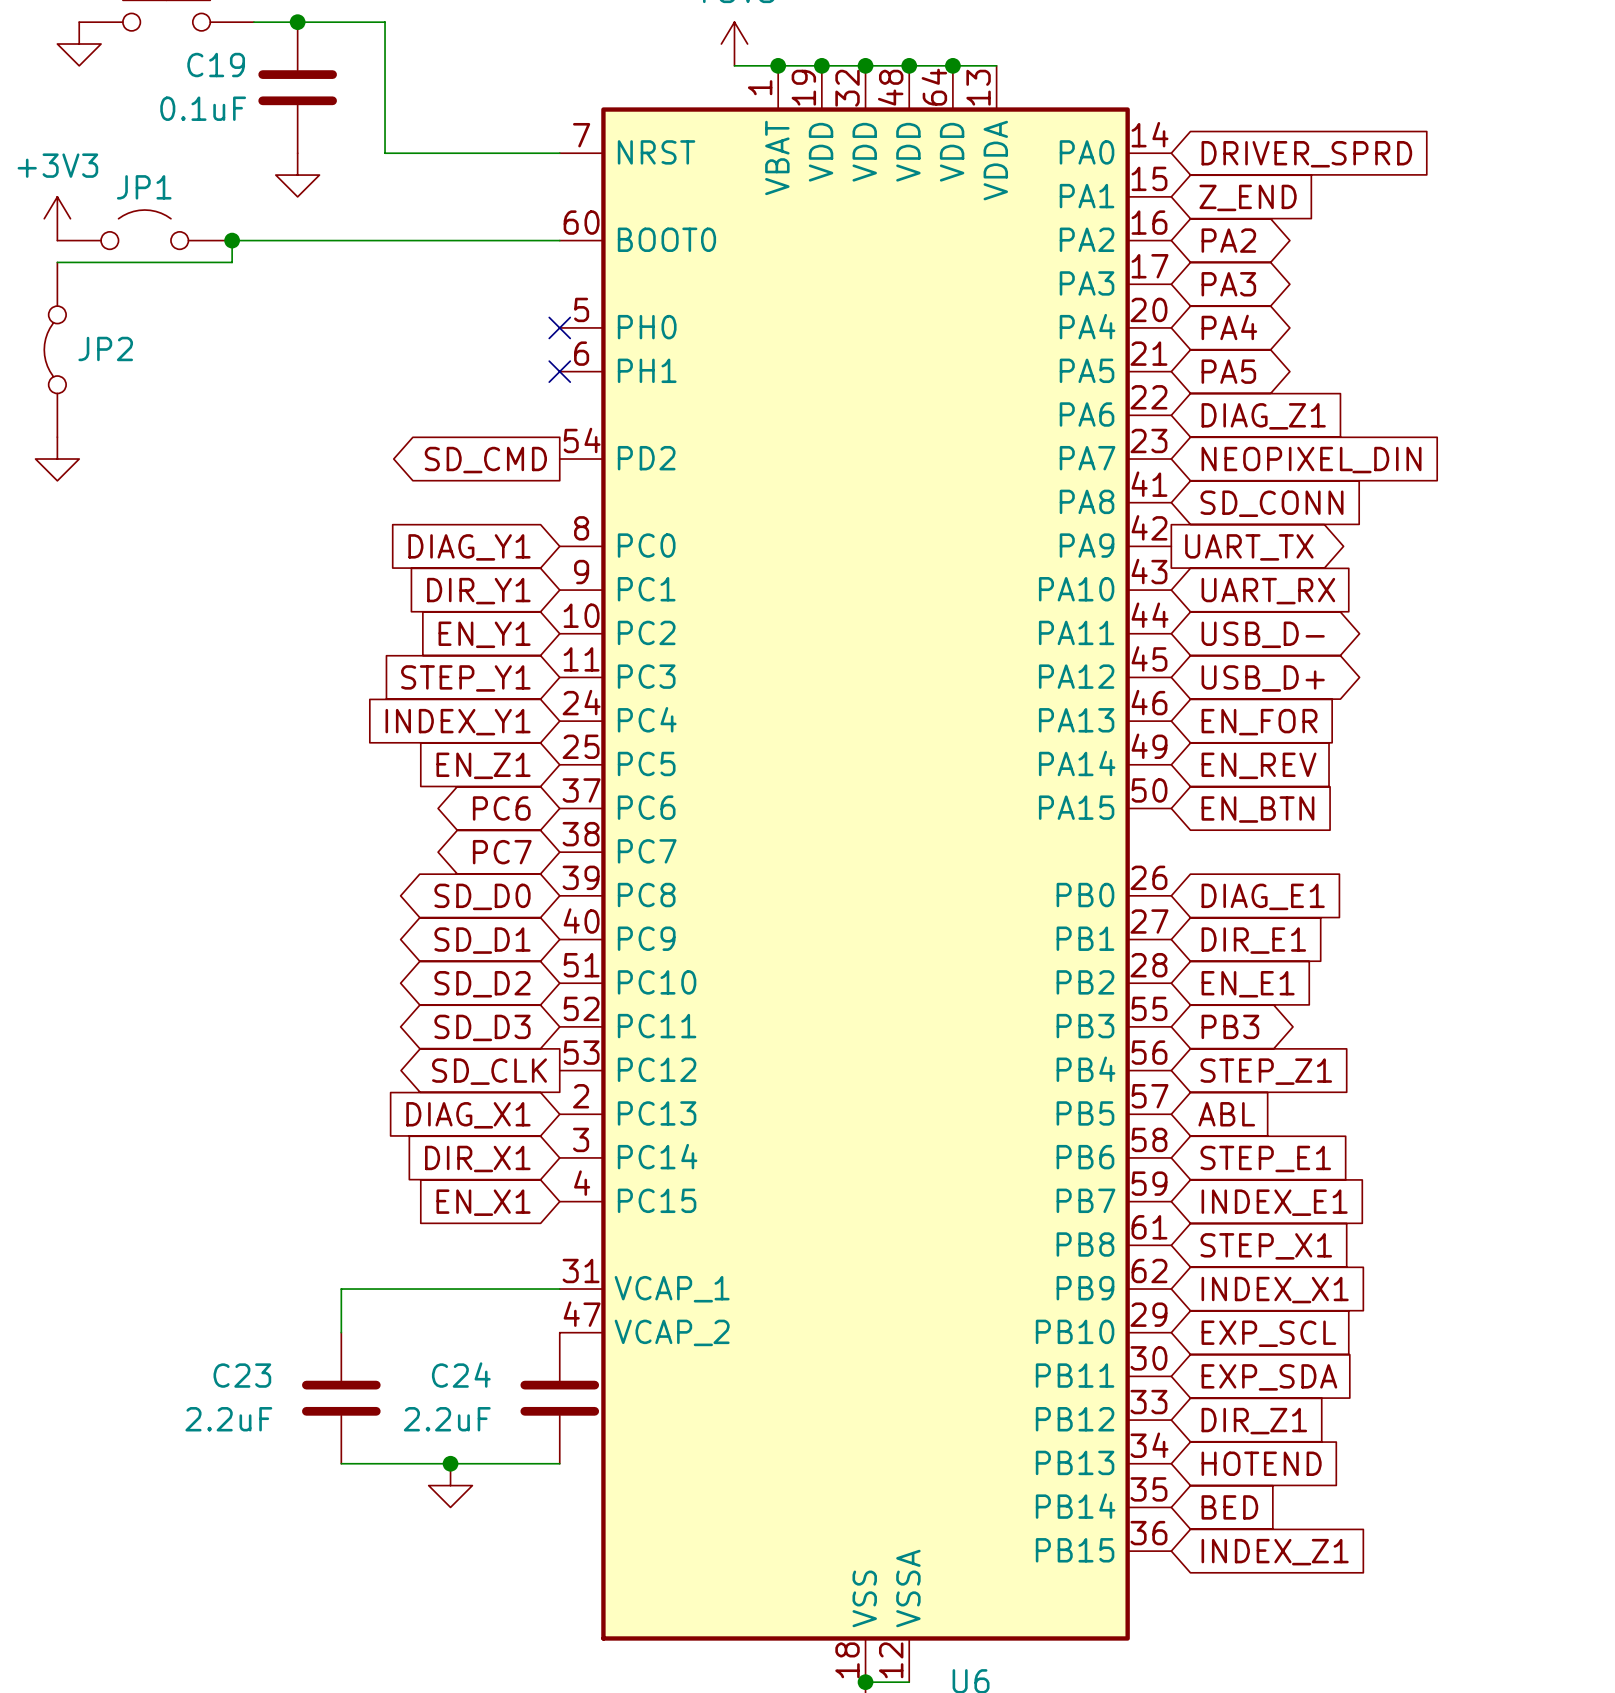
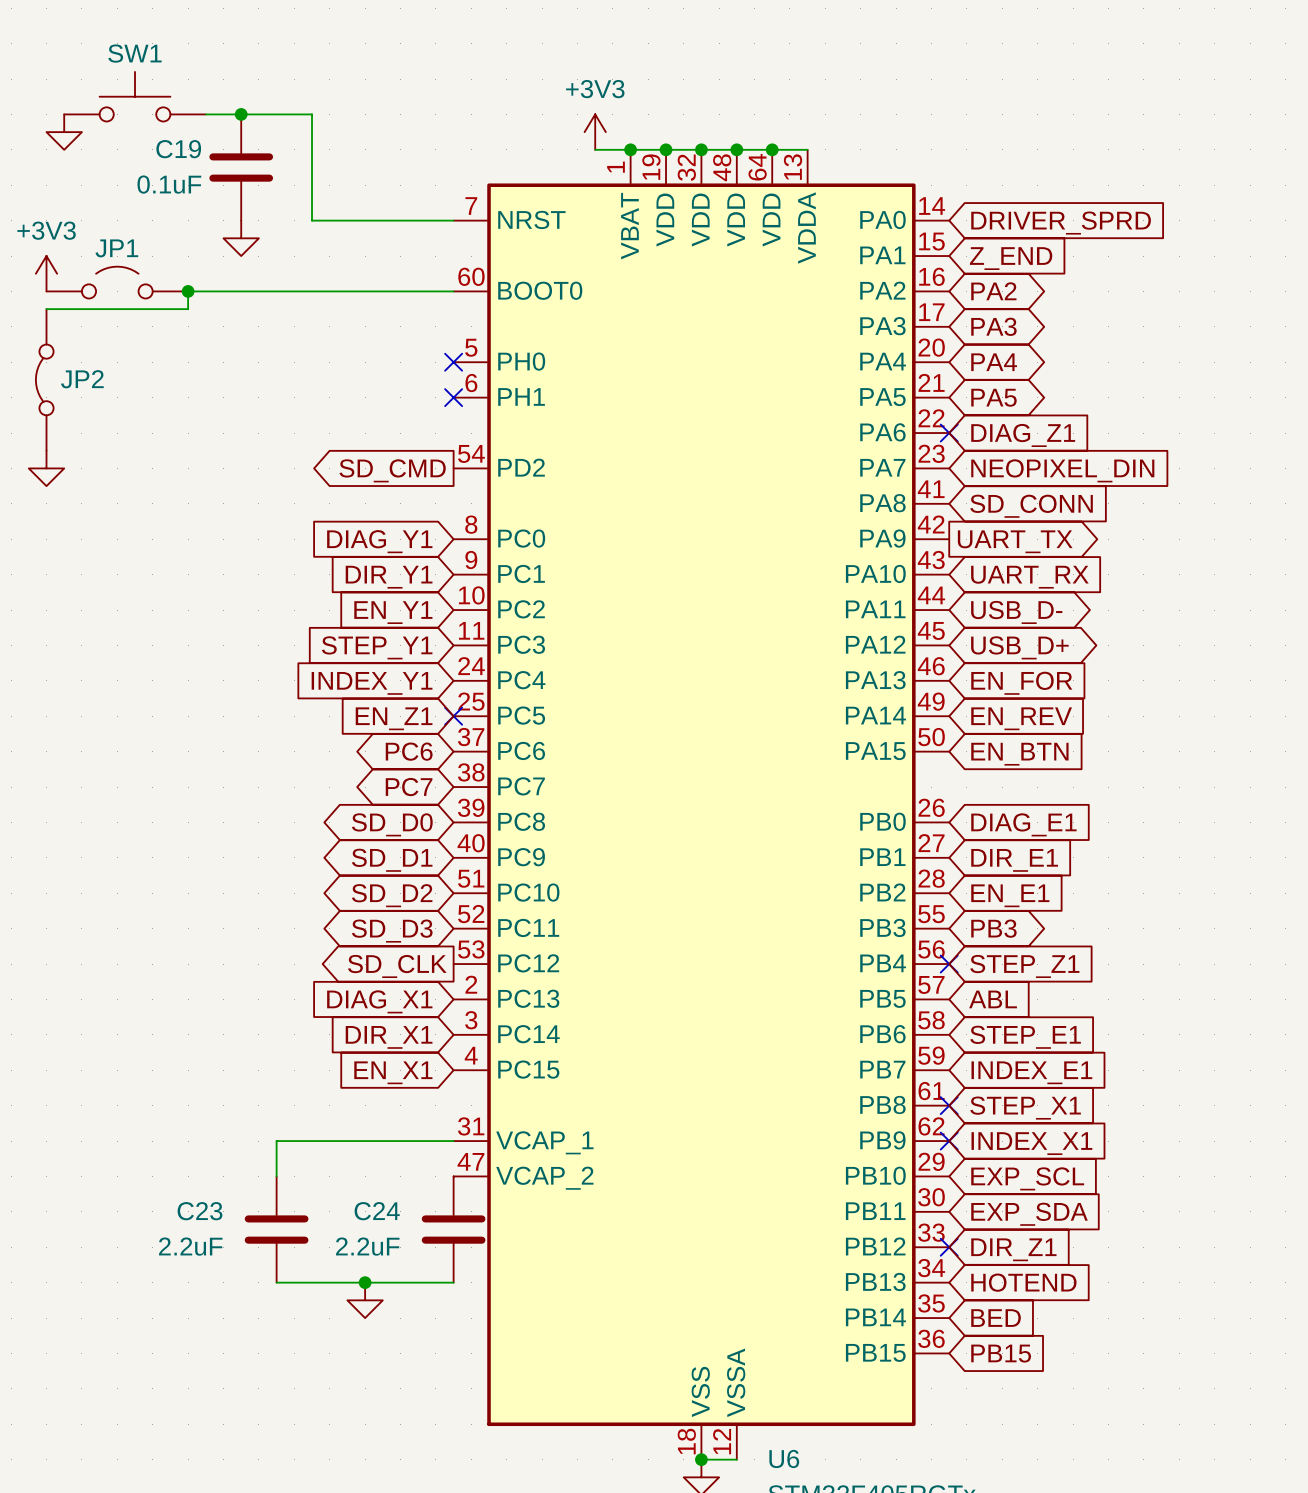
no-connect mark: none -> (949, 433)
no-connect mark: none -> (453, 716)
no-connect mark: none -> (949, 964)
no-connect mark: none -> (949, 1105)
no-connect mark: none -> (949, 1141)
no-connect mark: none -> (949, 1247)
global label: INDEX_Z1 (1275, 1552) -> PB15 (1001, 1353)

